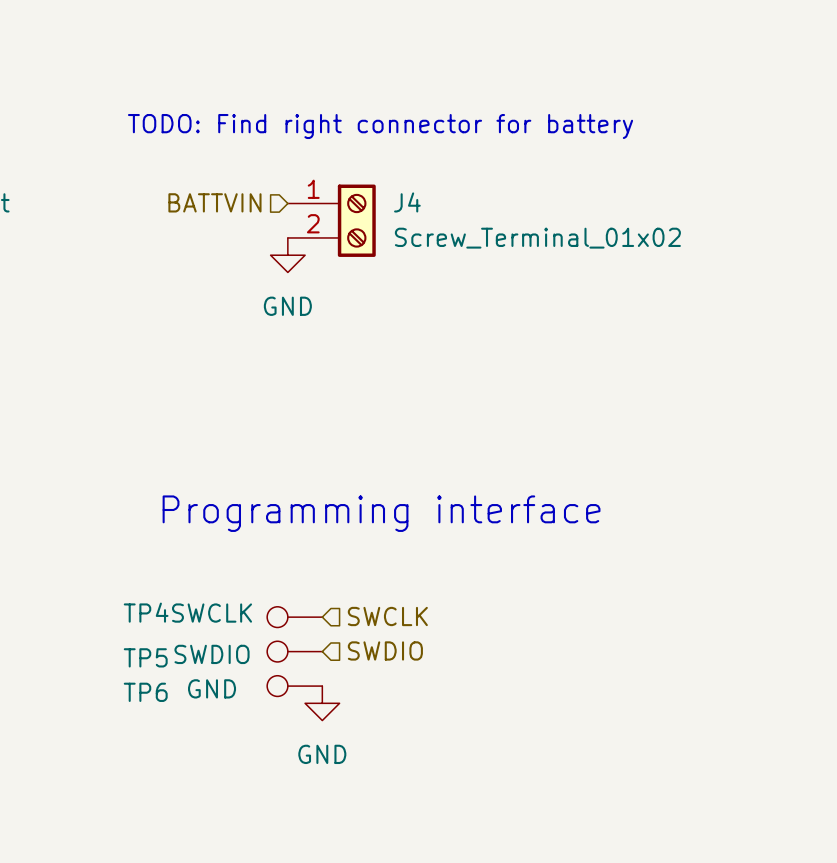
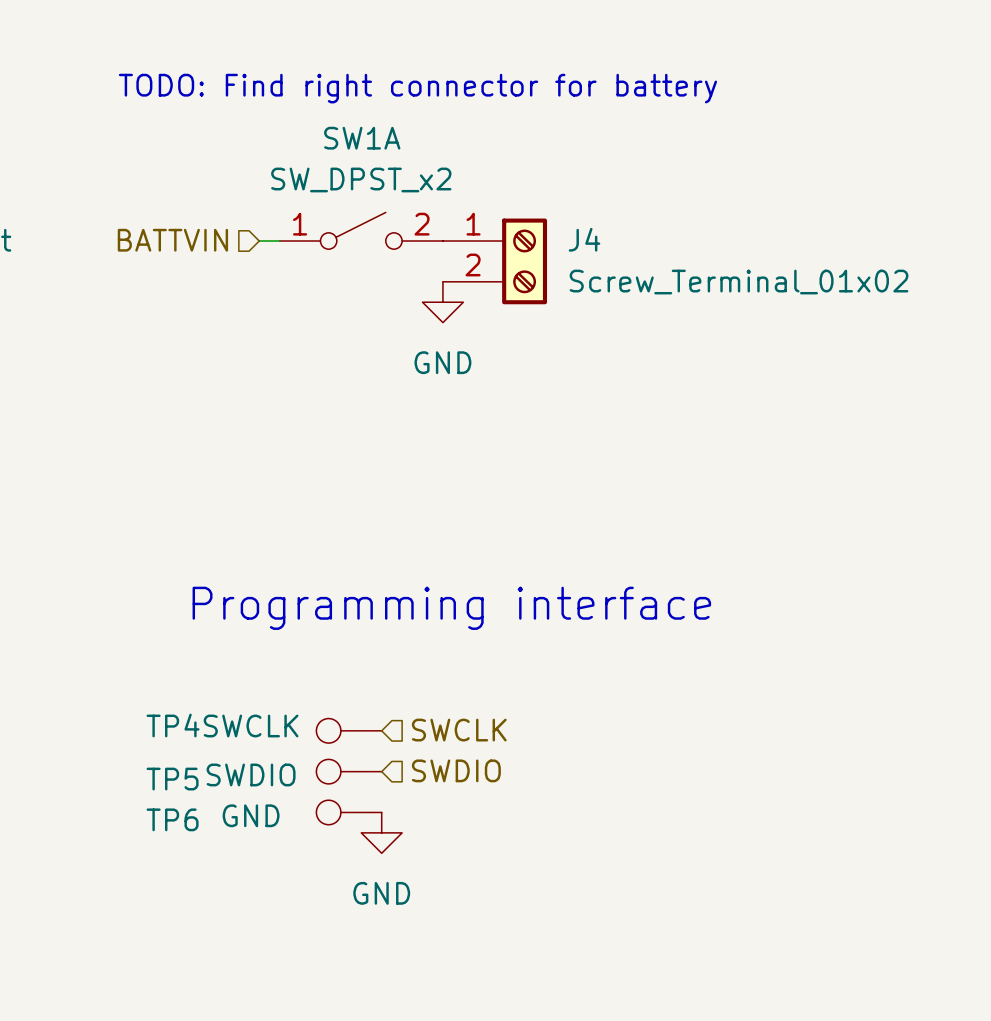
text position: TODO: Find right connector for battery (380, 126) -> TODO: Find right connector for battery (417, 88)
SW1A: none -> SW_DPST_x2 (361, 230)
hierarchical label position: BATTVIN (214, 202) -> BATTVIN (172, 240)
wire: none -> (259, 241) (279, 241)
J4 position: (331, 220) -> (494, 261)
power symbol position: GND (287, 255) -> GND (442, 302)

